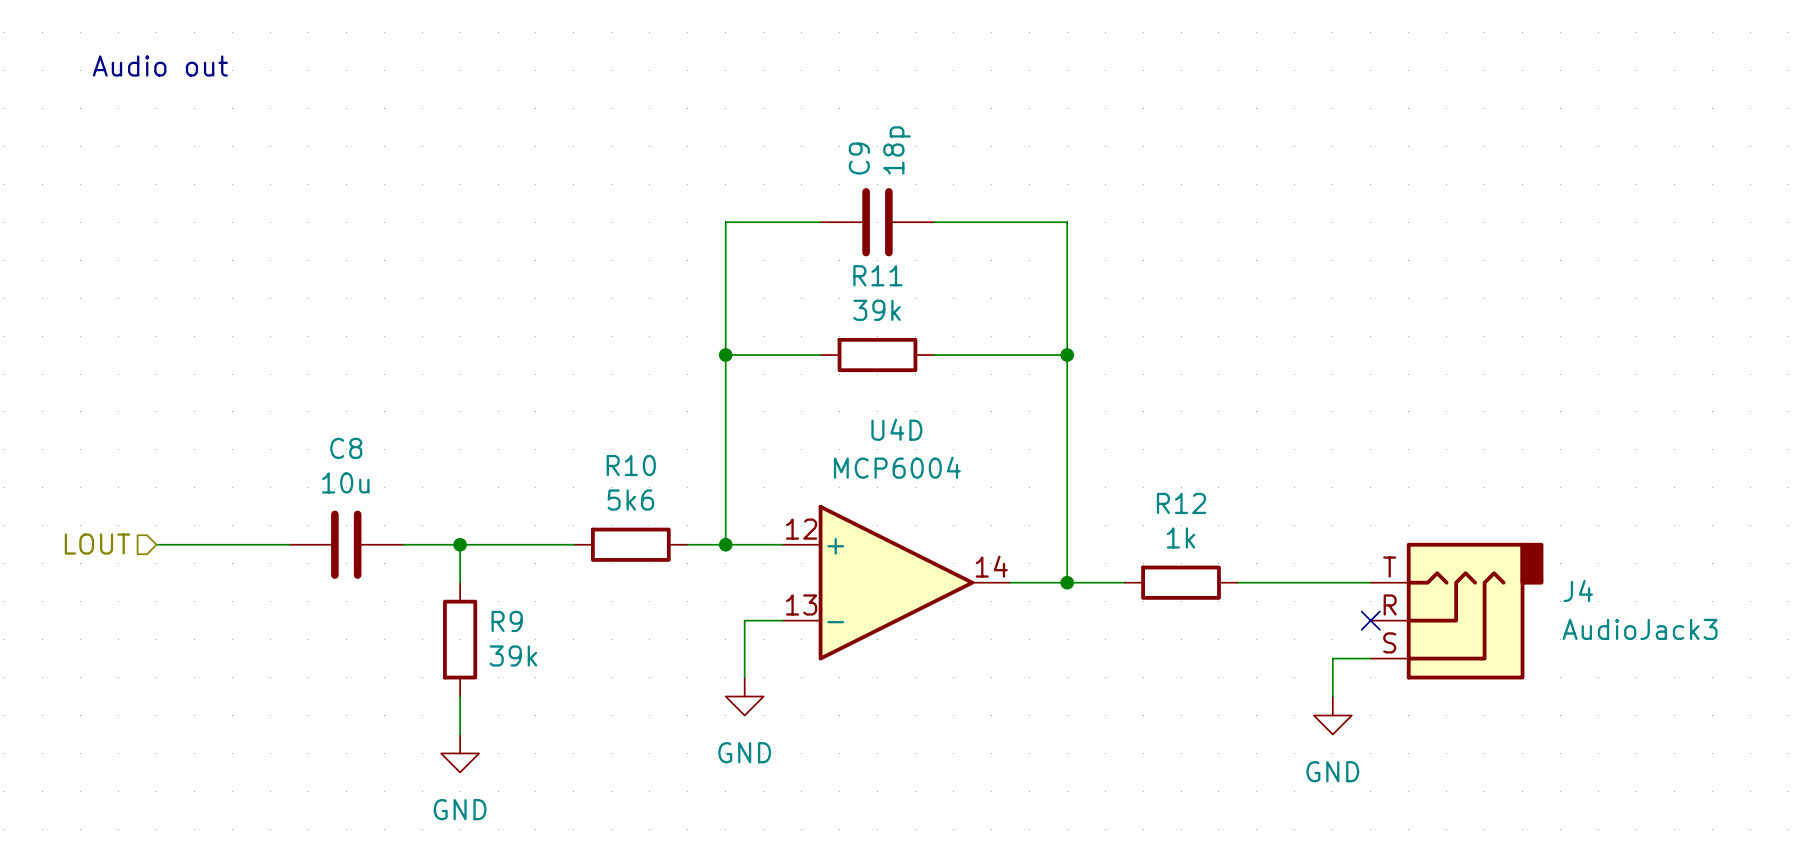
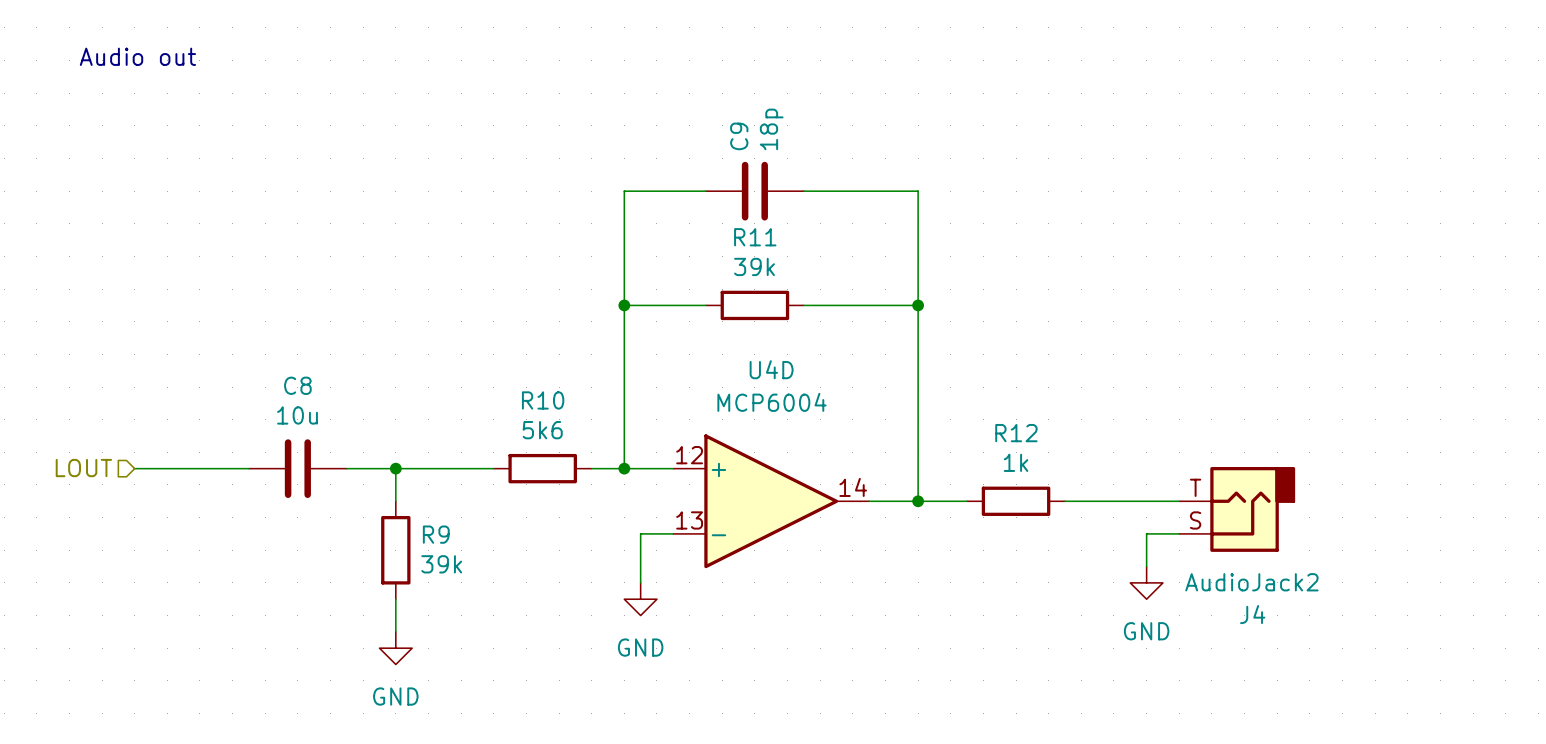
J4 symbol: [1370, 542, 1544, 680] -> [1179, 467, 1296, 552]
J4 name position: J4 (1578, 591) -> J4 (1252, 614)
no-connect mark: (1370, 620) -> none
J4 value: AudioJack3 (1640, 629) -> AudioJack2 (1251, 582)
wire: (1370, 658) (1332, 658) (1332, 696) -> (1179, 533) (1146, 533) (1146, 566)
power symbol position: GND (1332, 715) -> GND (1146, 582)

